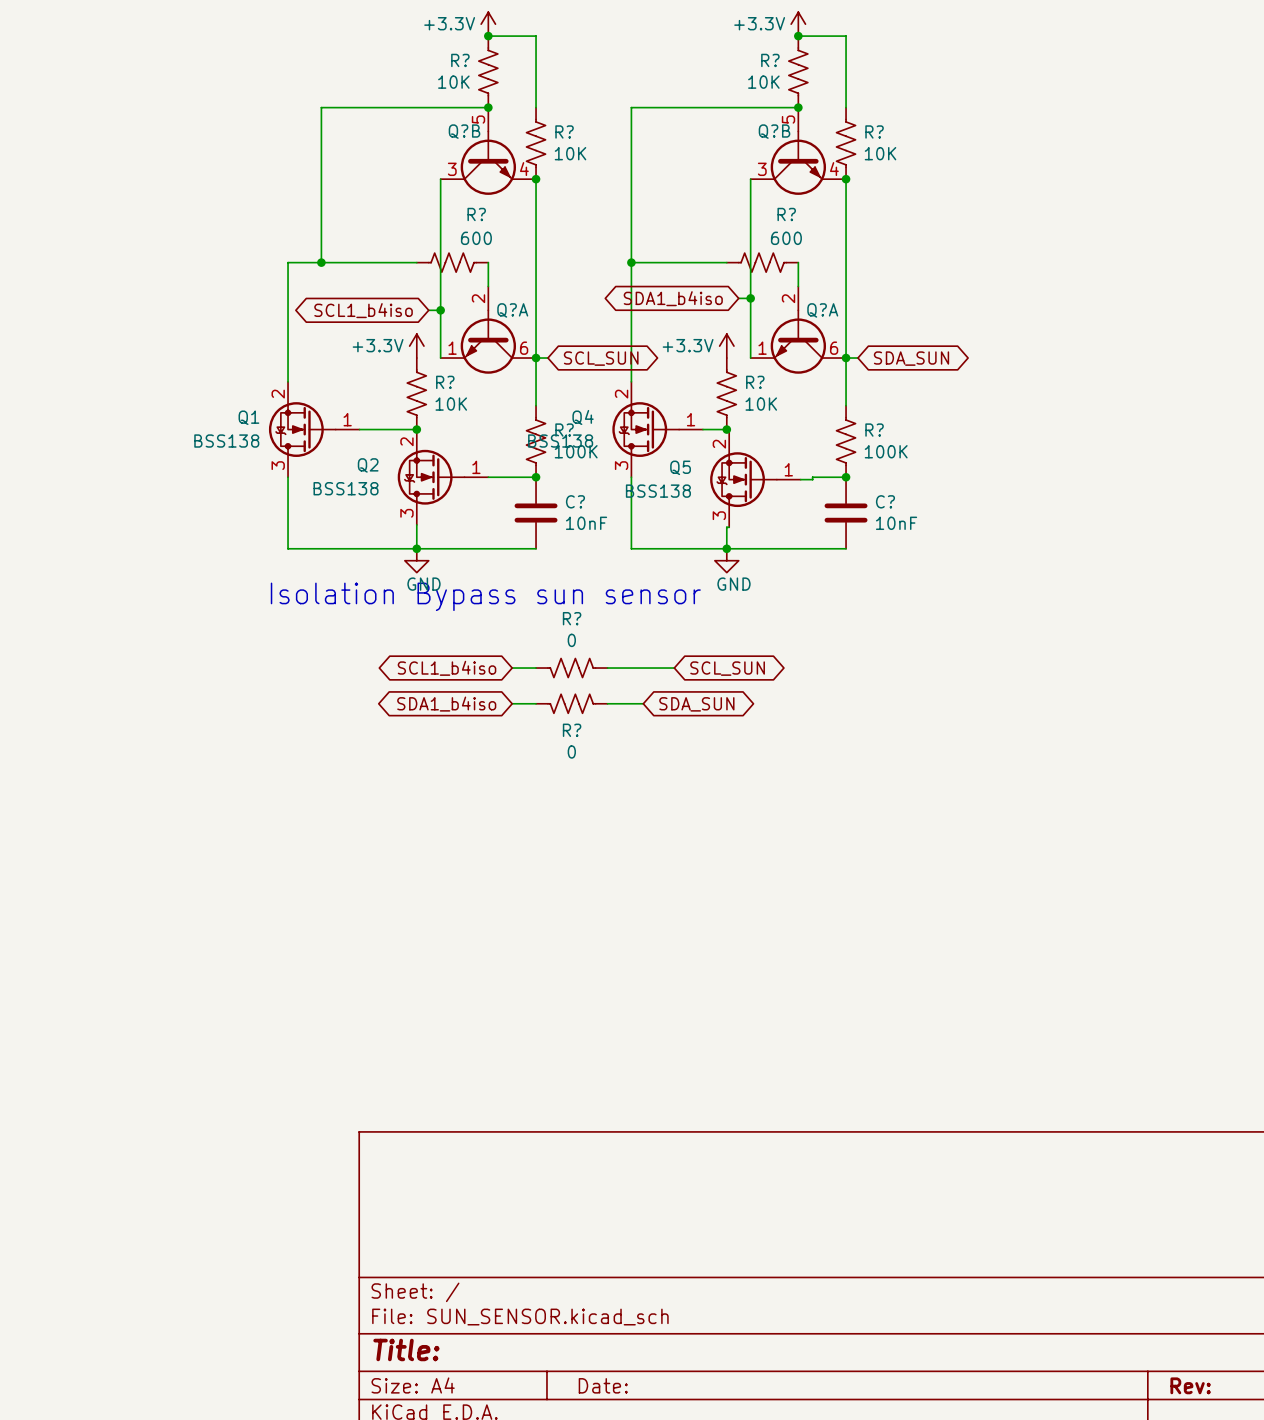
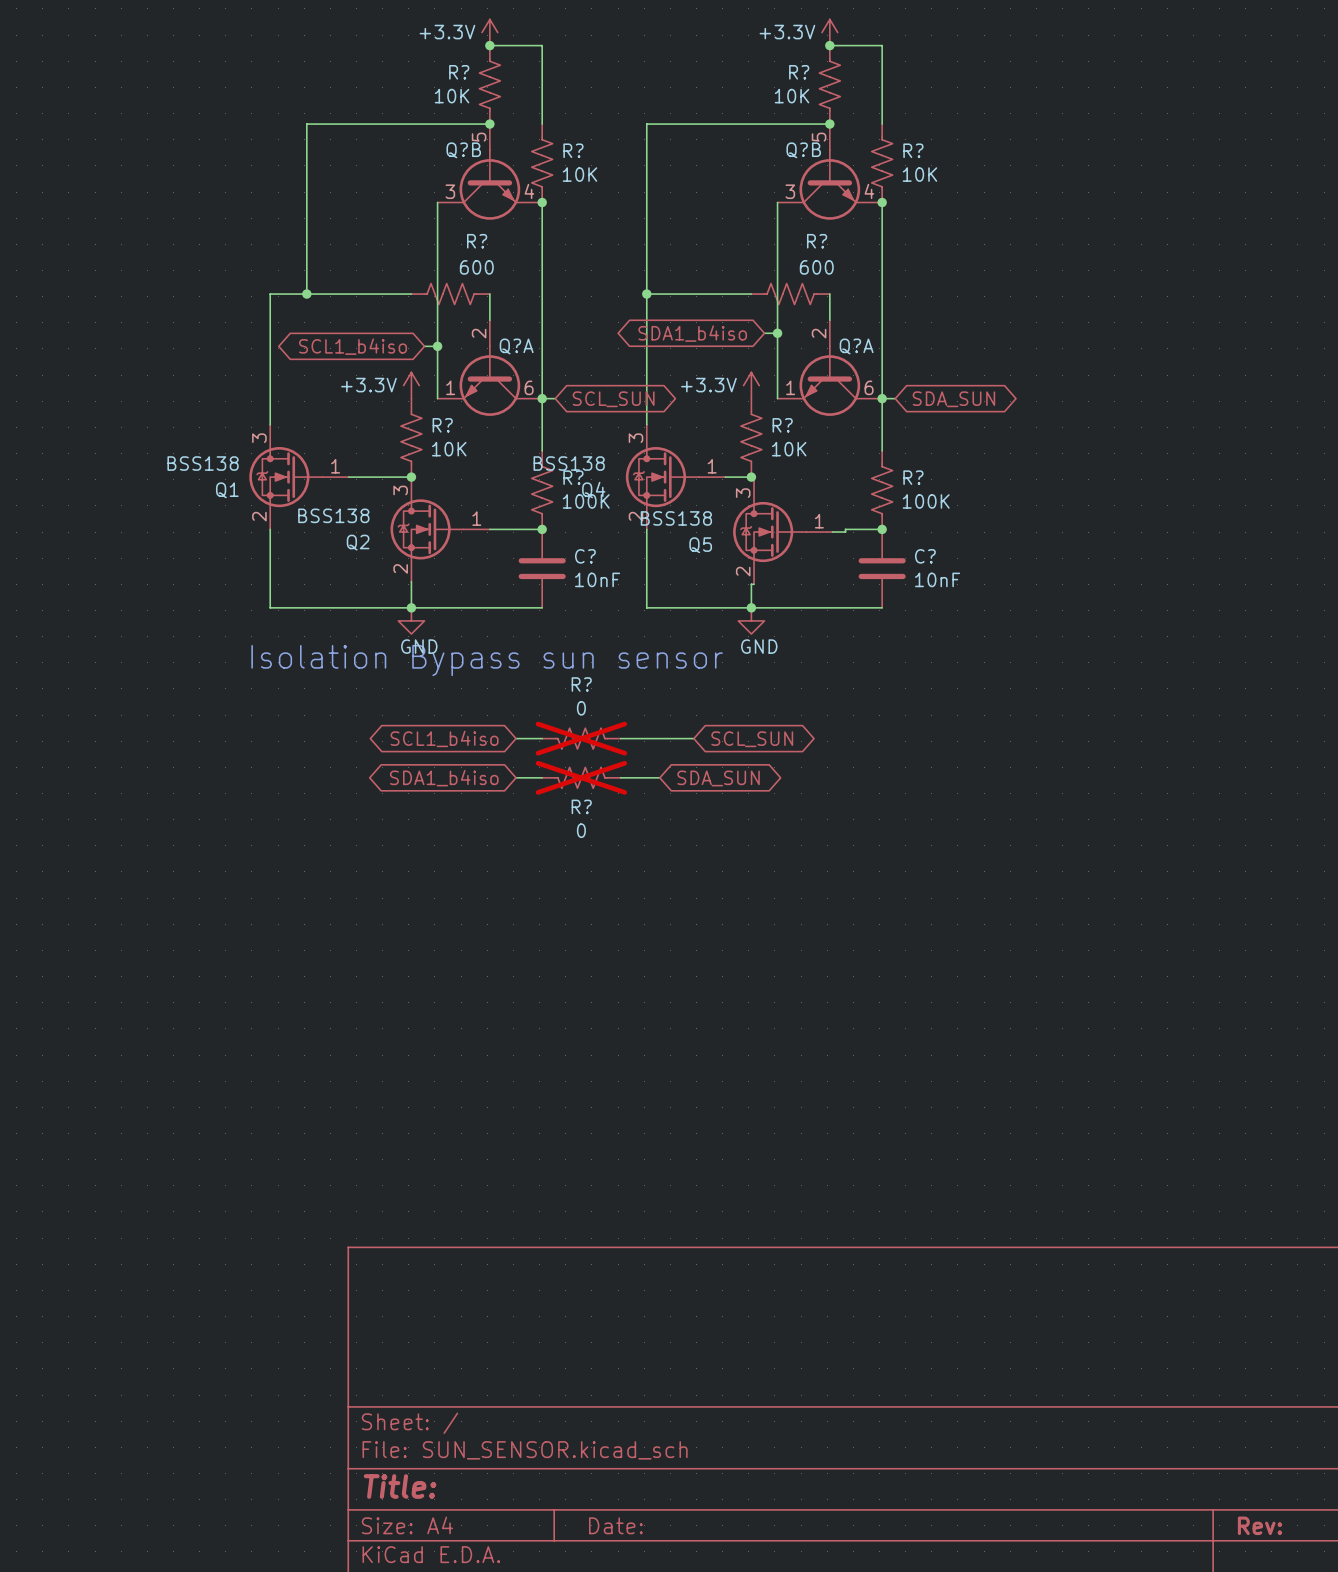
Q1 flip: as is (302, 429) -> up-down (285, 477)
Q4 flip: as is (645, 429) -> up-down (662, 477)
Q2 flip: as is (431, 477) -> up-down (427, 529)
Q5 flip: as is (743, 479) -> up-down (769, 532)
R? do-not-place cross: none -> (581, 738)
R? do-not-place cross: none -> (581, 777)

